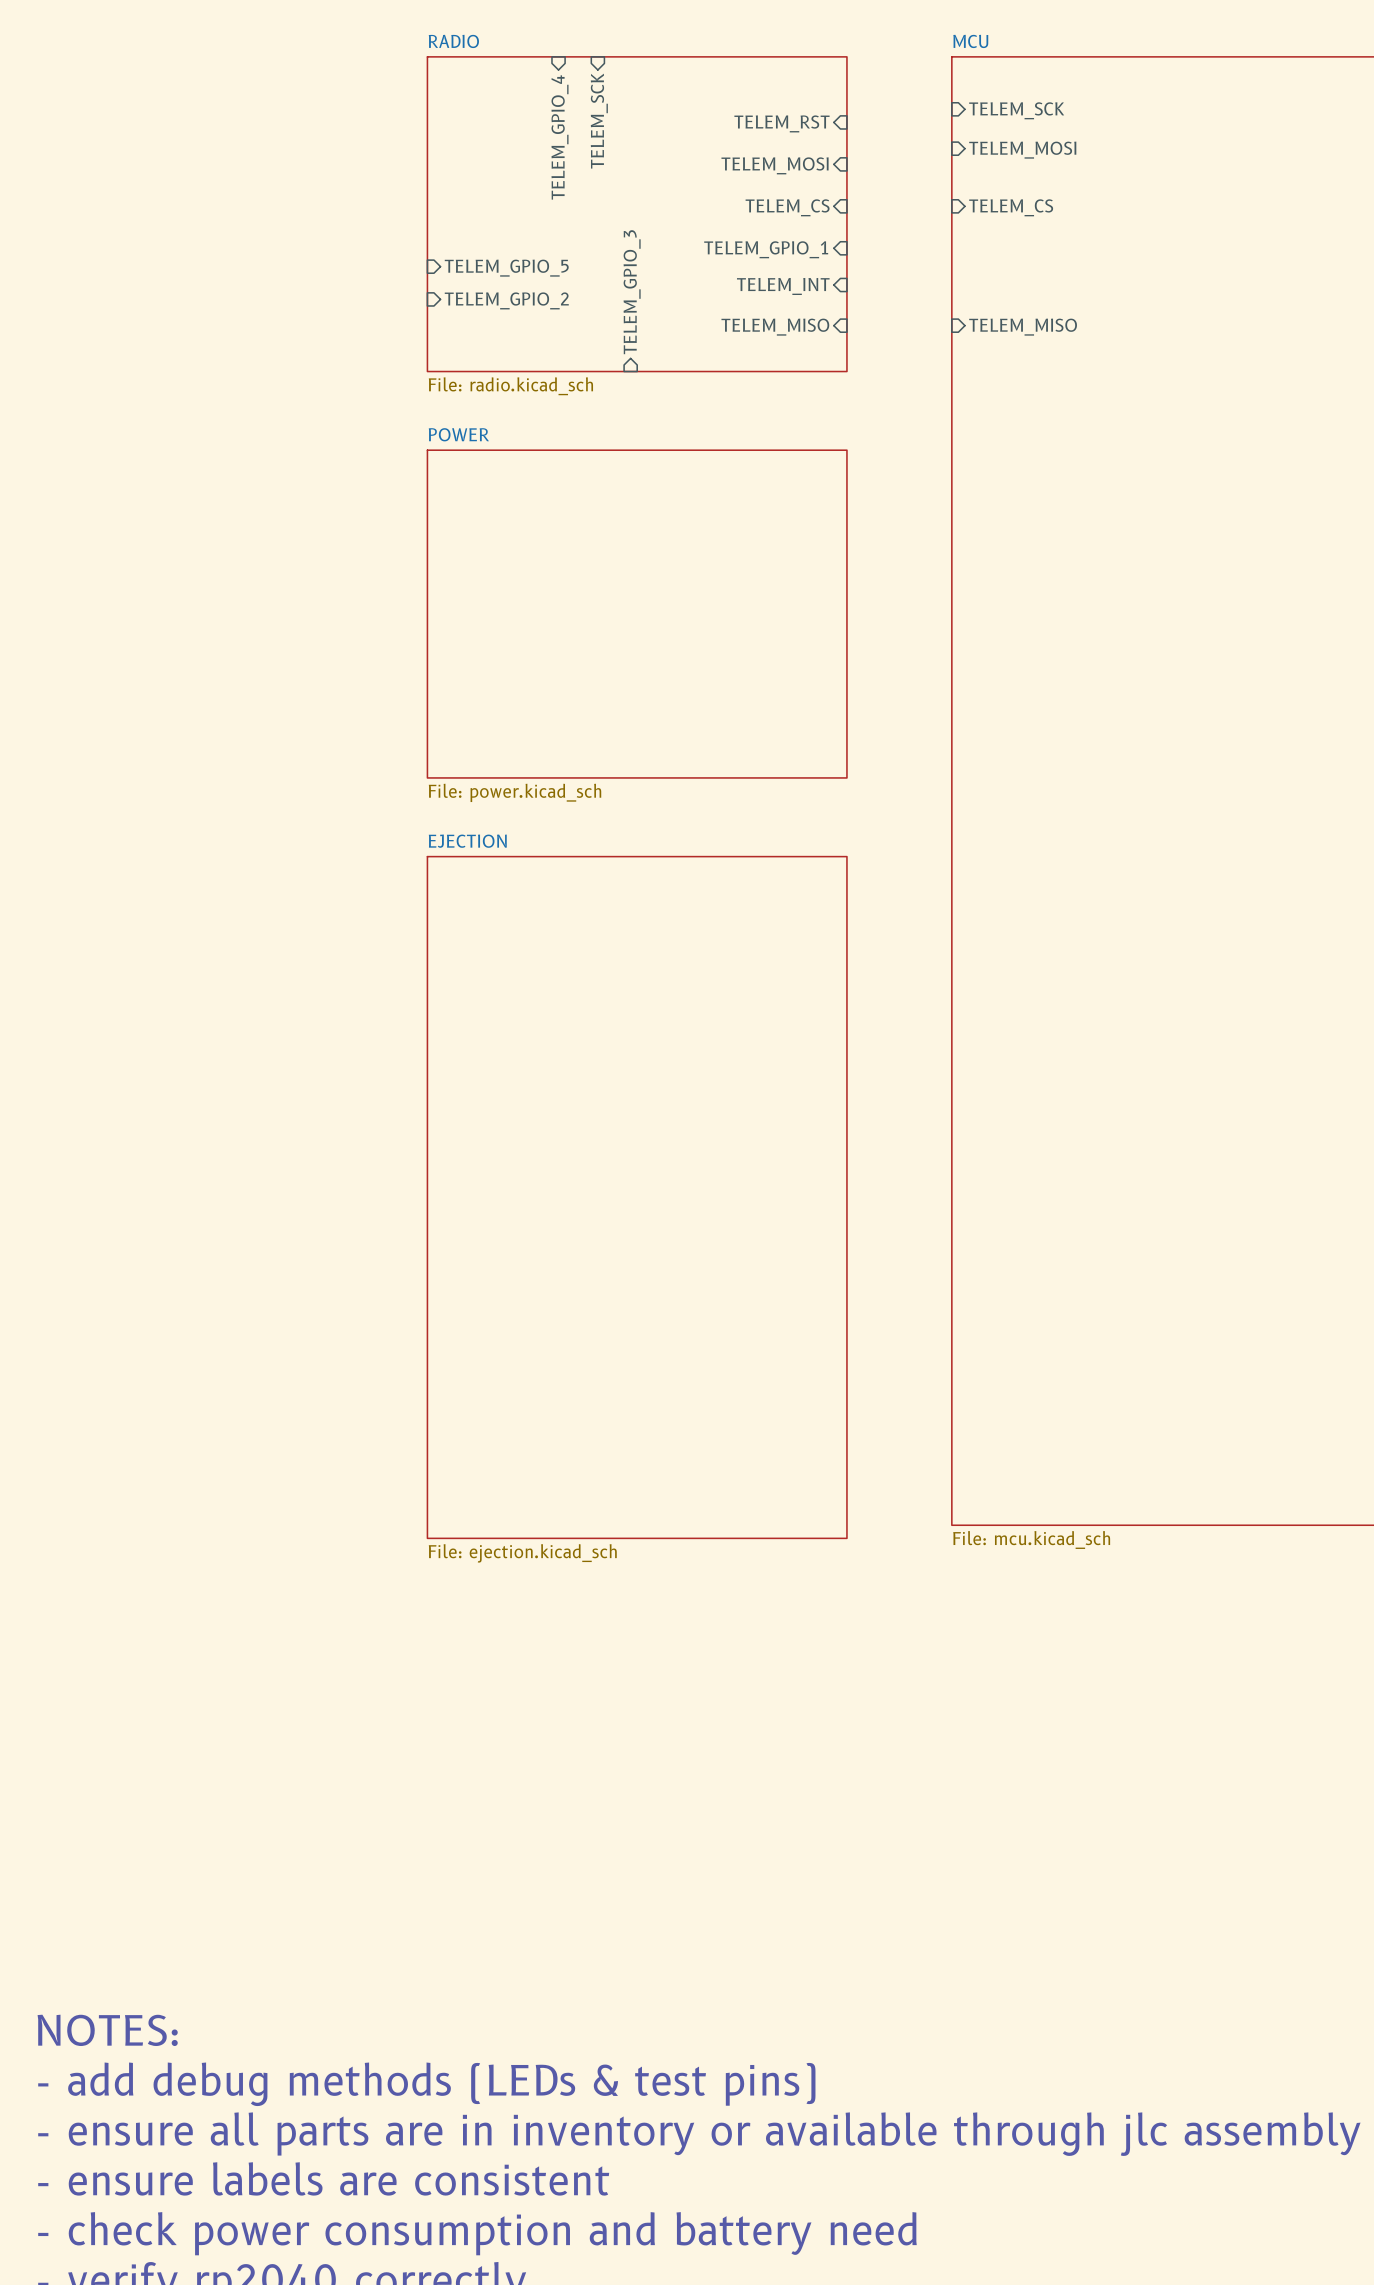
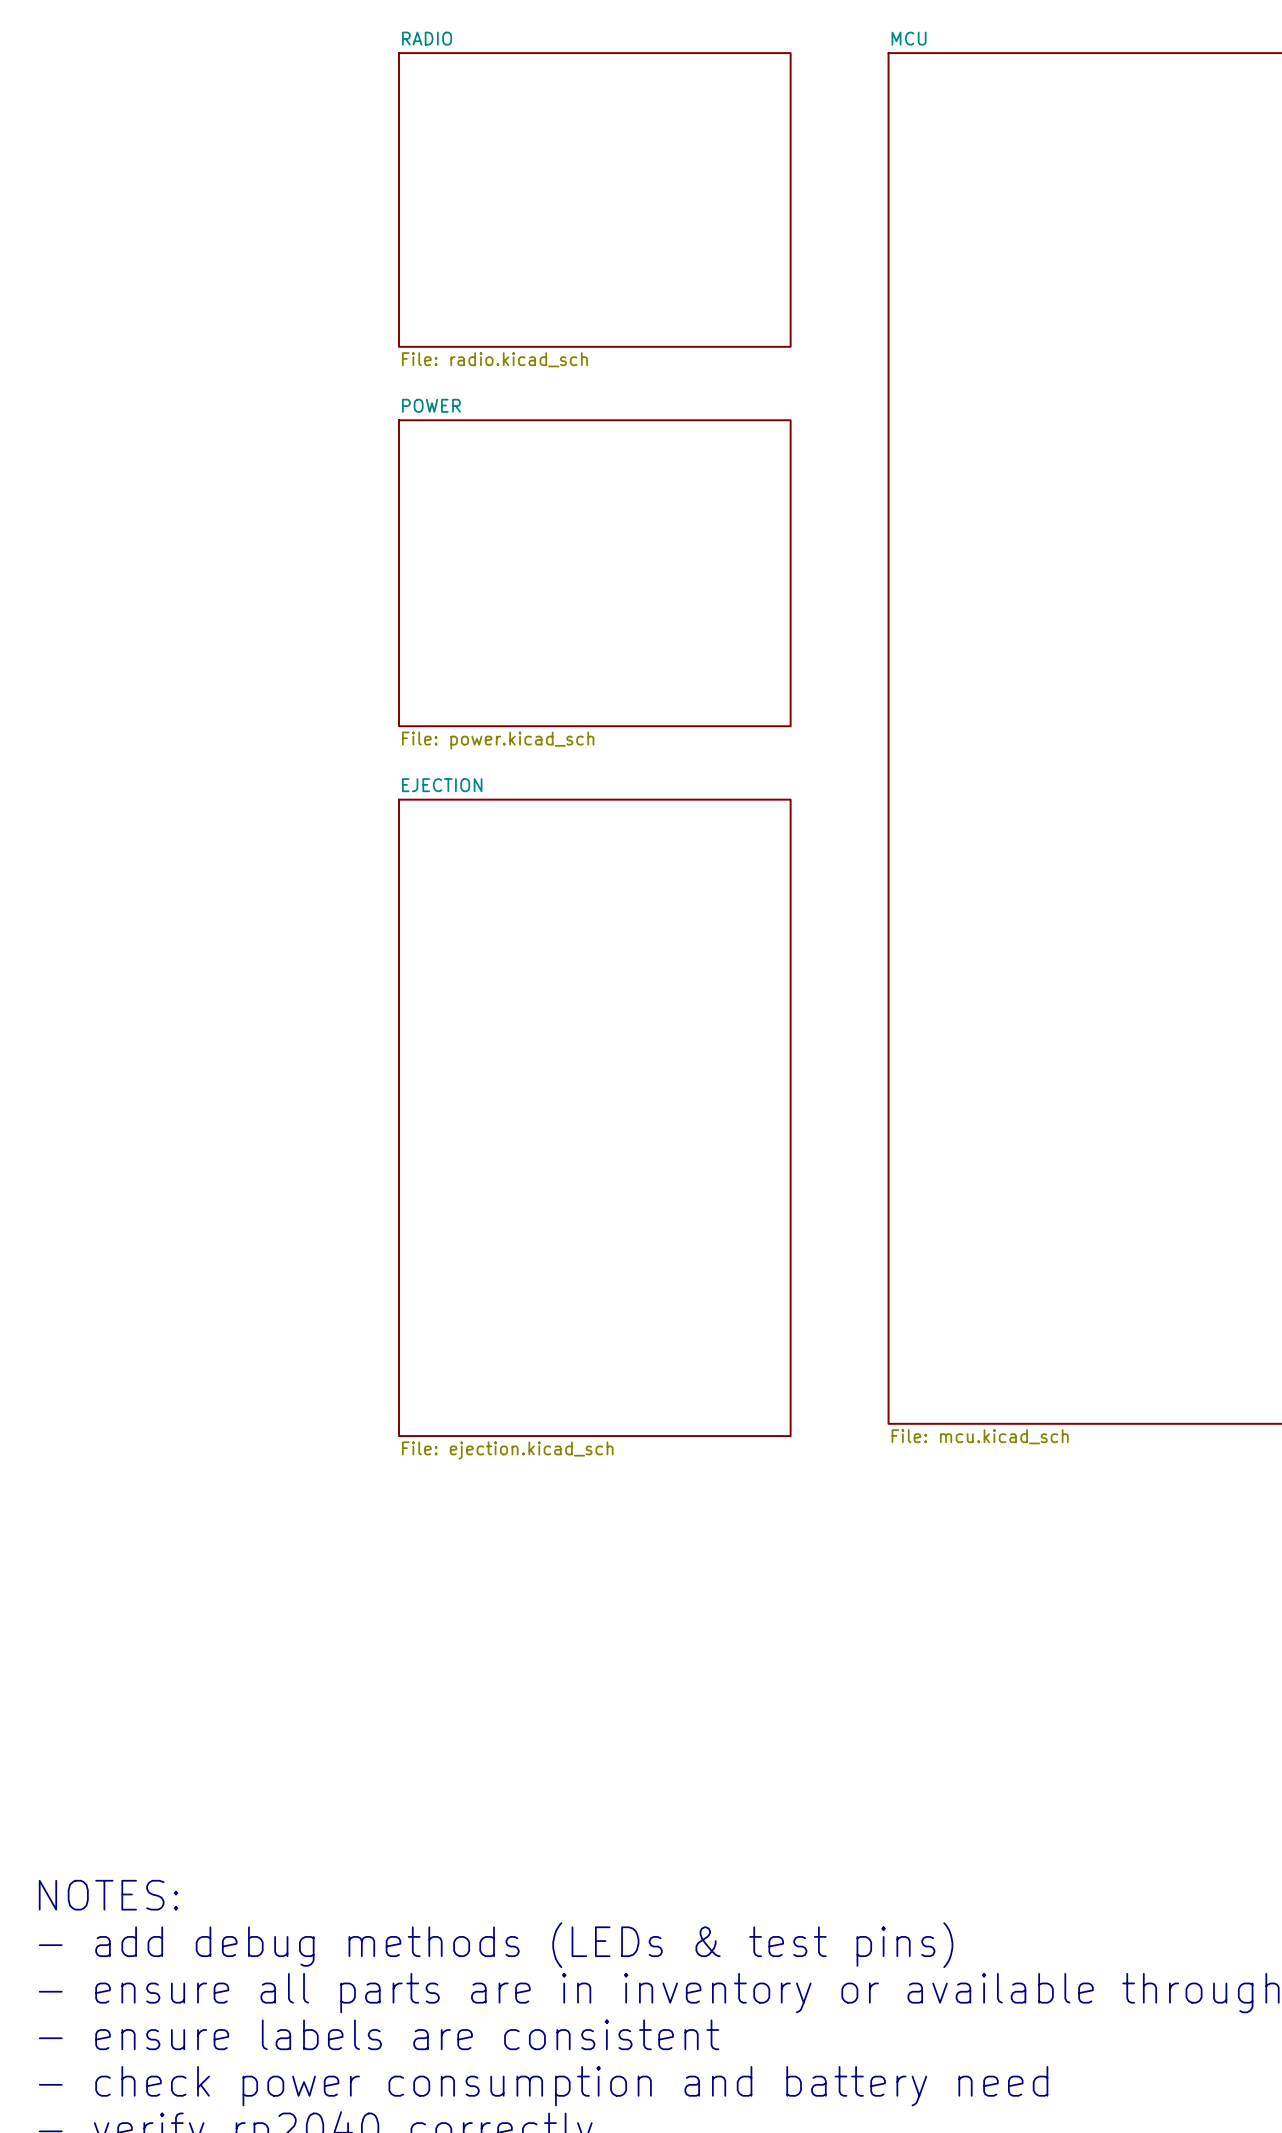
sheet pin: TELEM_SCK (1016, 110) -> none
sheet pin: TELEM_SCK (599, 121) -> none
sheet pin: TELEM_RST (781, 123) -> none
sheet pin: TELEM_GPIO_4 (560, 137) -> none
sheet pin: TELEM_MOSI (1022, 150) -> none
sheet pin: TELEM_MOSI (775, 165) -> none
sheet pin: TELEM_CS (787, 207) -> none
sheet pin: TELEM_CS (1011, 207) -> none
sheet pin: TELEM_GPIO_1 (766, 249) -> none
sheet pin: TELEM_GPIO_5 (506, 268) -> none
sheet pin: TELEM_INT (783, 286) -> none
sheet pin: TELEM_GPIO_3 (632, 292) -> none
sheet pin: TELEM_GPIO_2 (506, 300) -> none
sheet pin: TELEM_MISO (775, 327) -> none
sheet pin: TELEM_MISO (1023, 327) -> none

